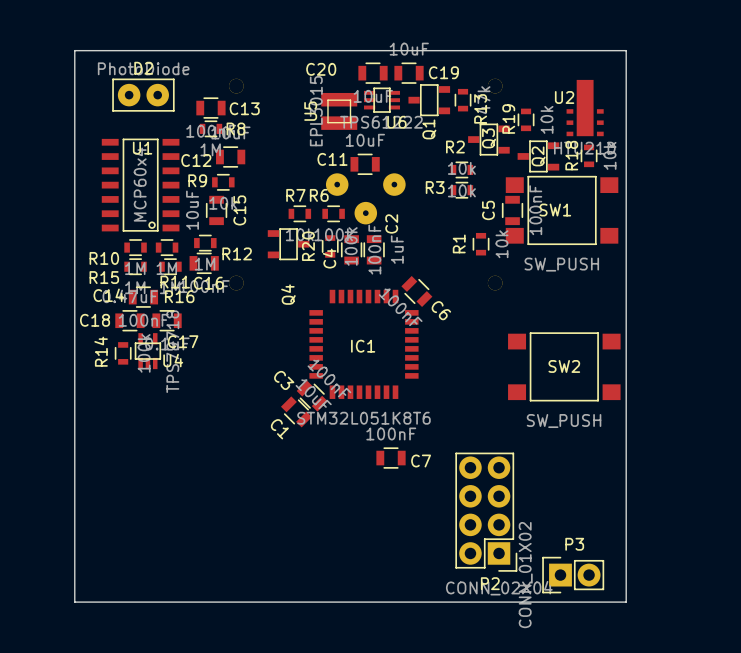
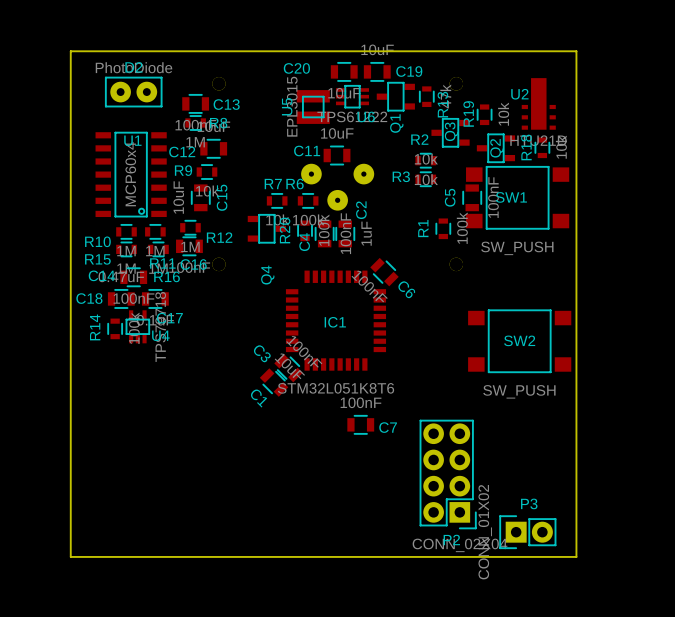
R1 value: 10k (501, 244) -> 100k (462, 228)

